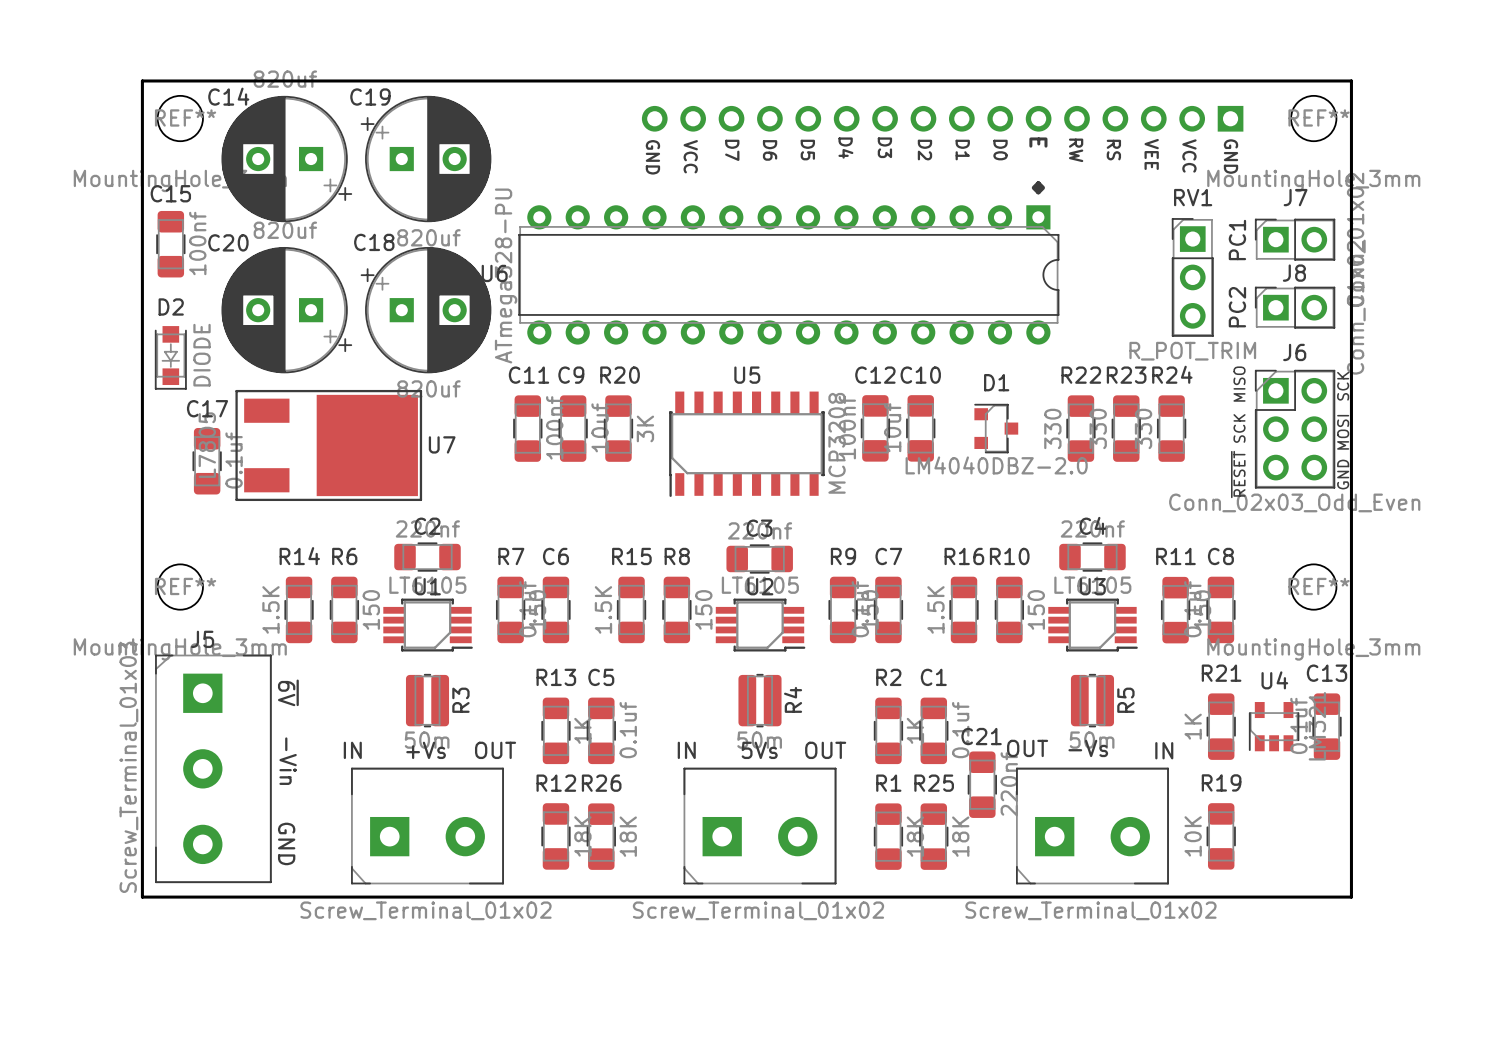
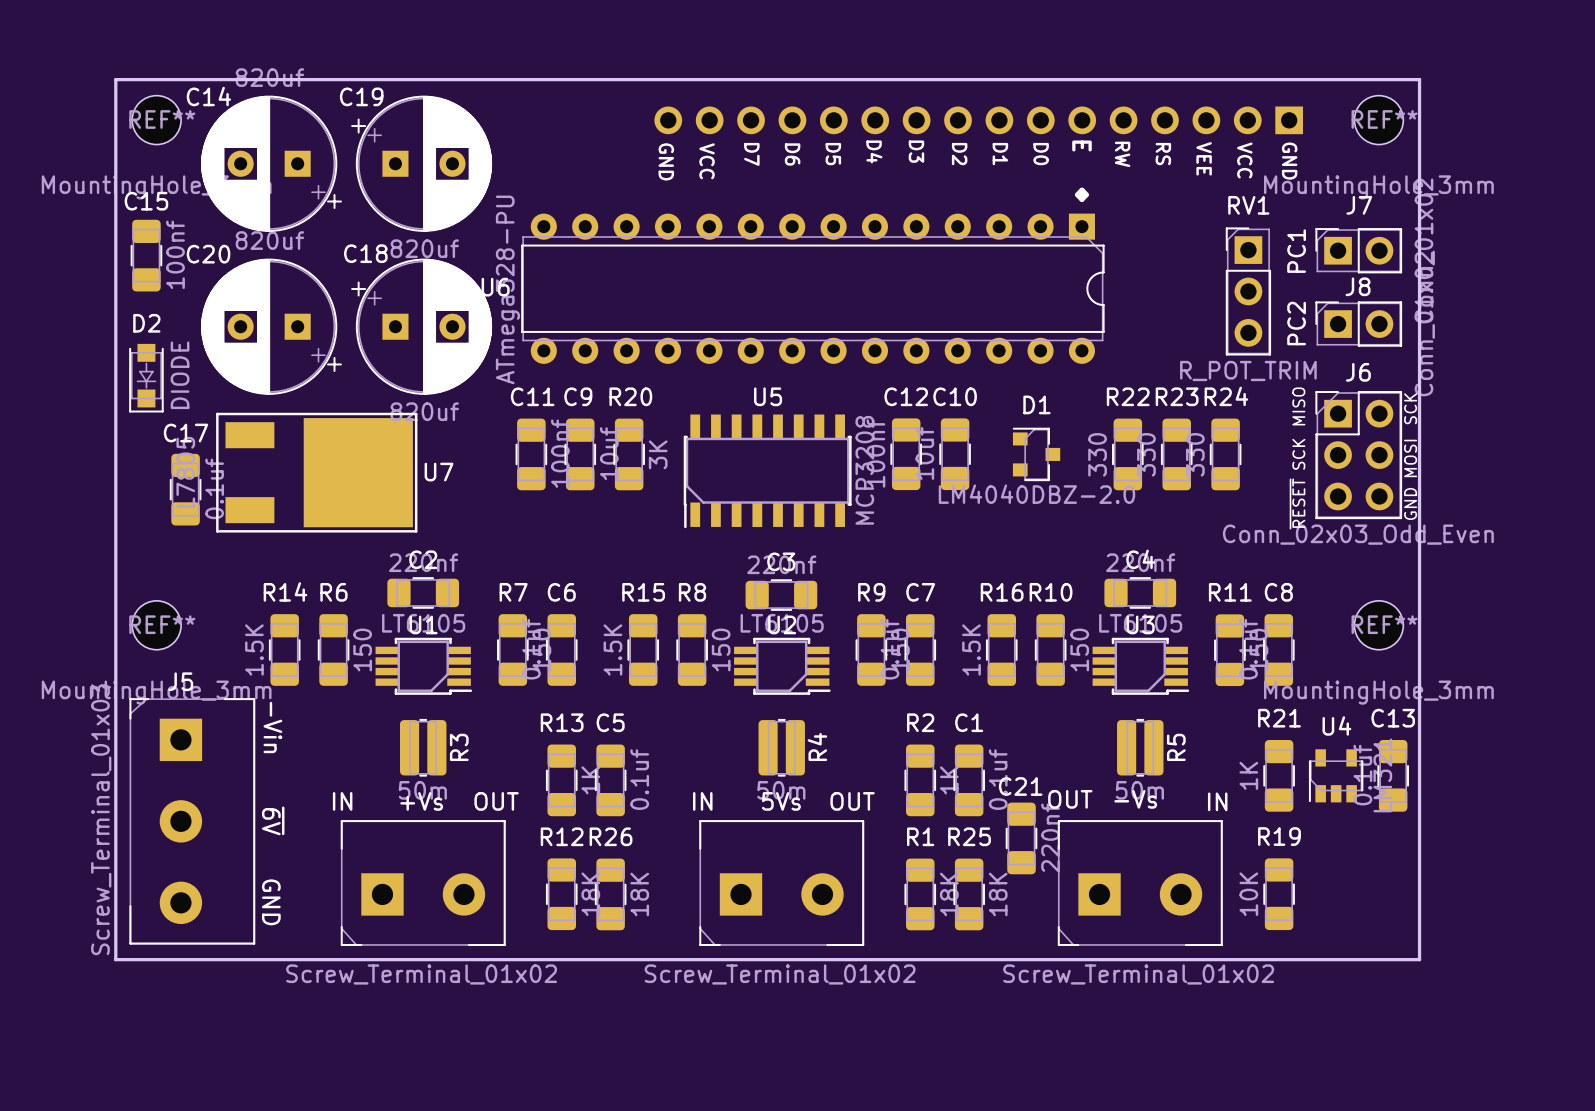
text: ~{6V} (288, 692) -> -Vin (272, 727)
text: -Vin (288, 761) -> ~{6V} (273, 820)

